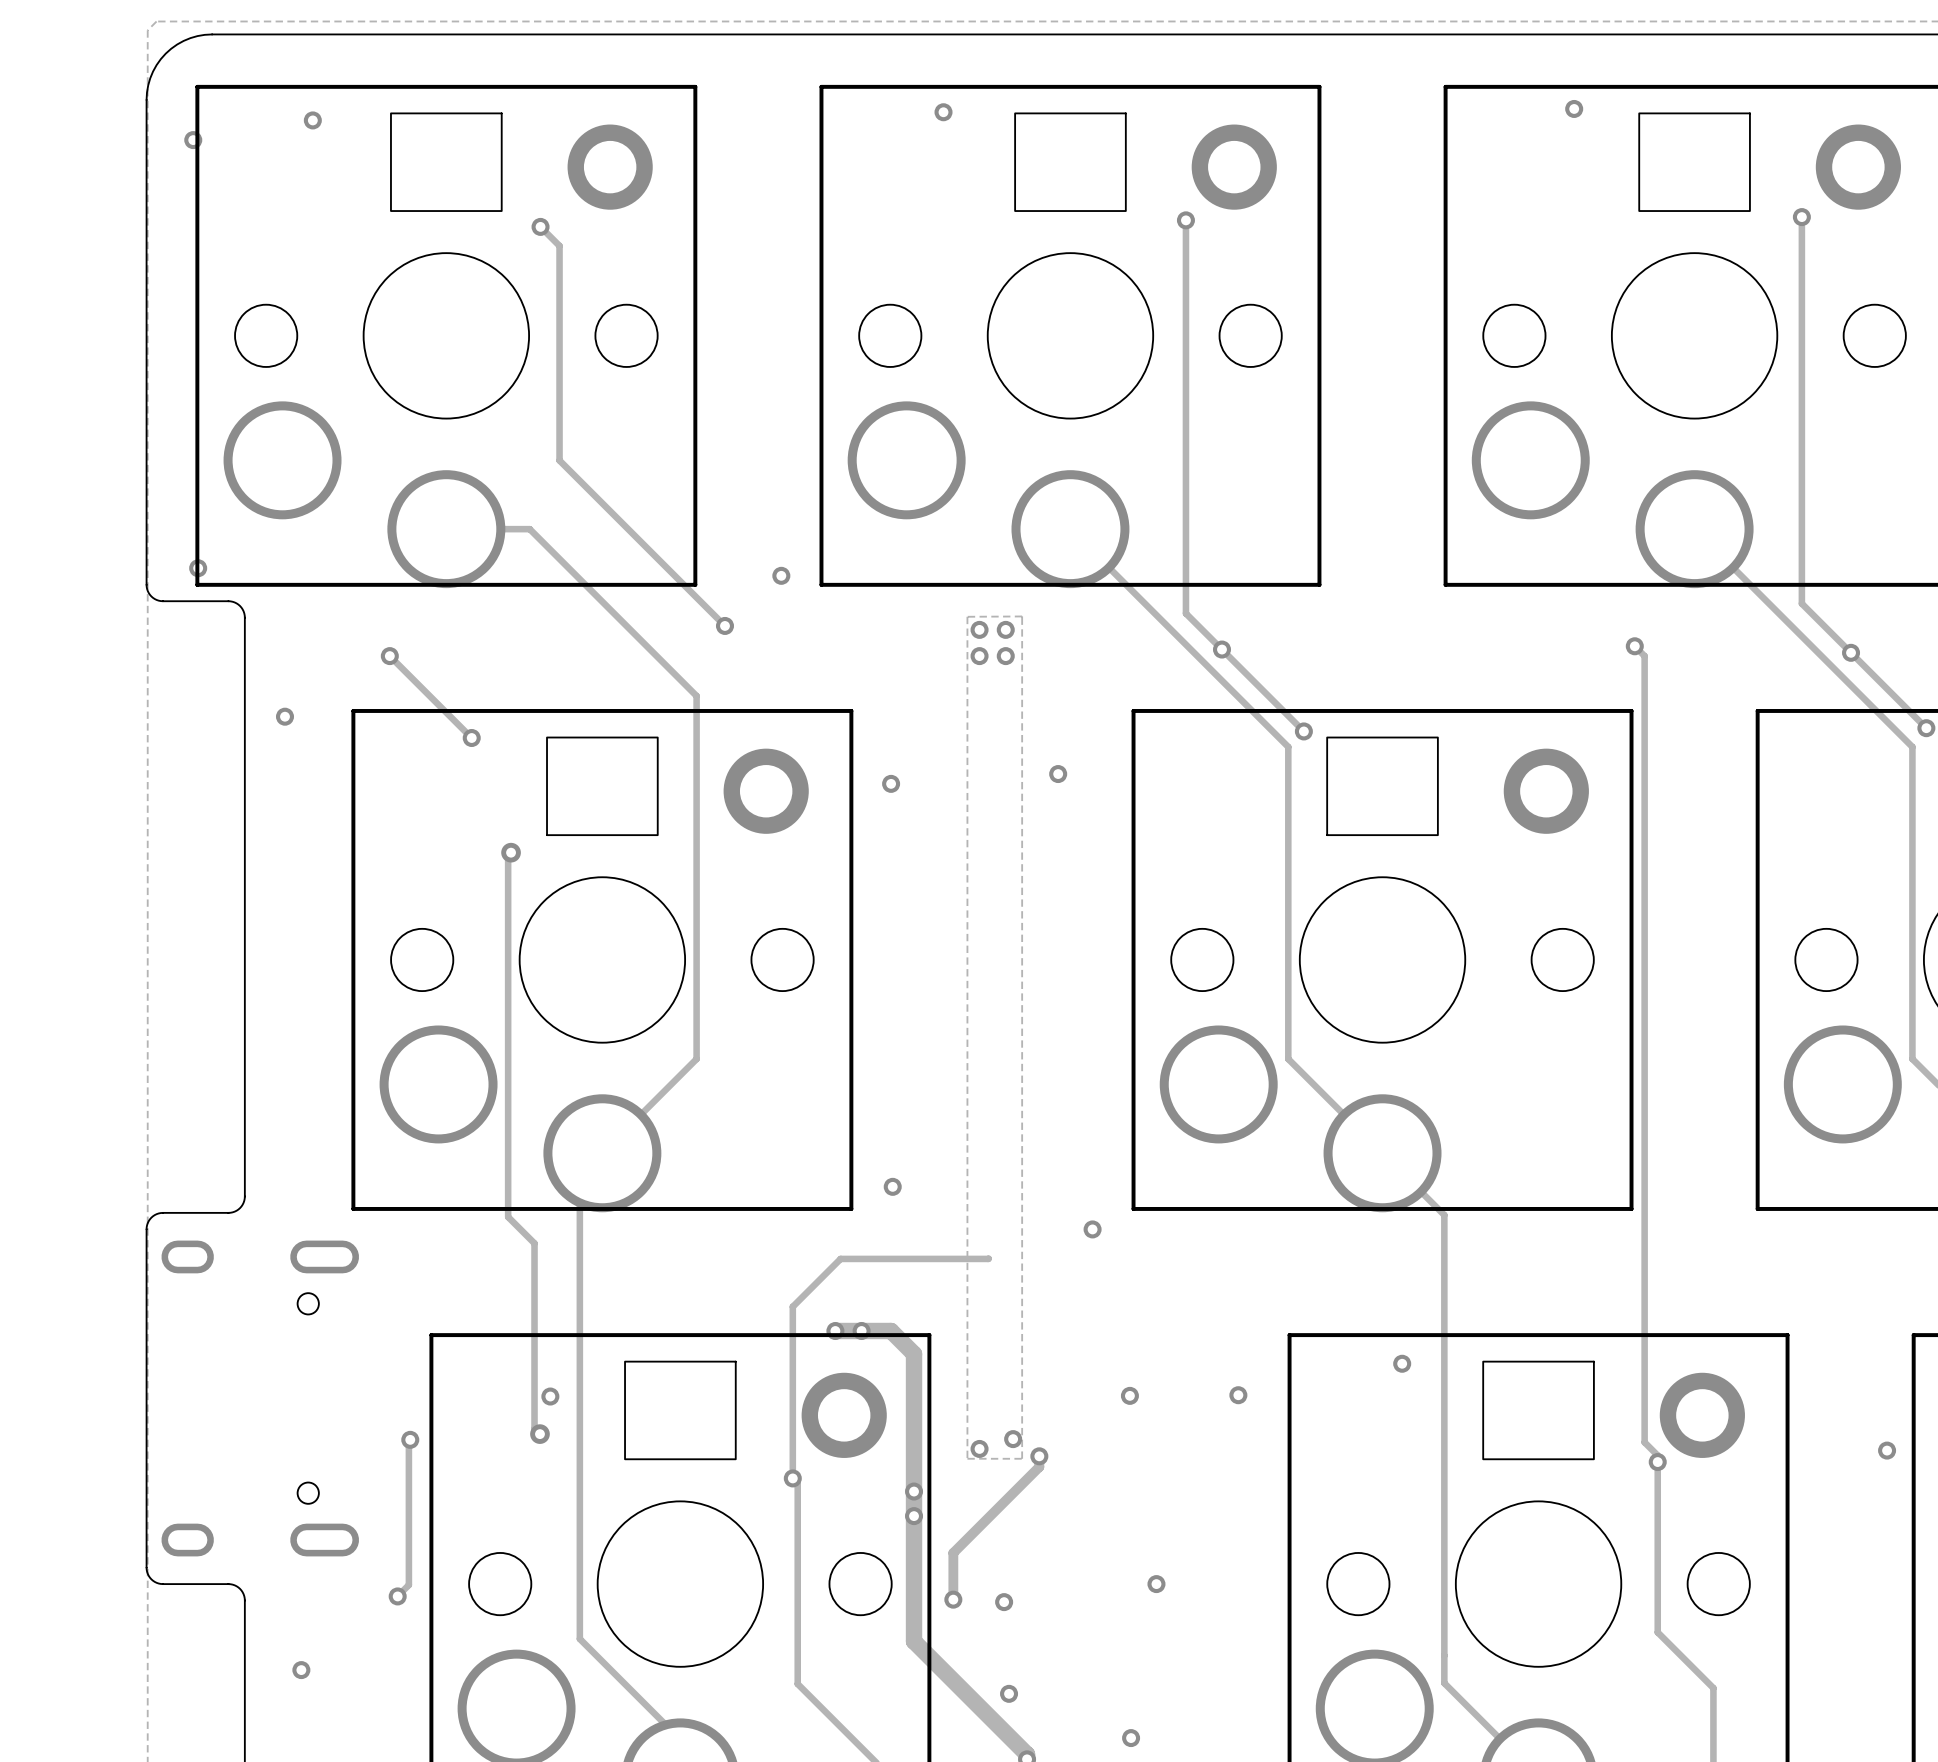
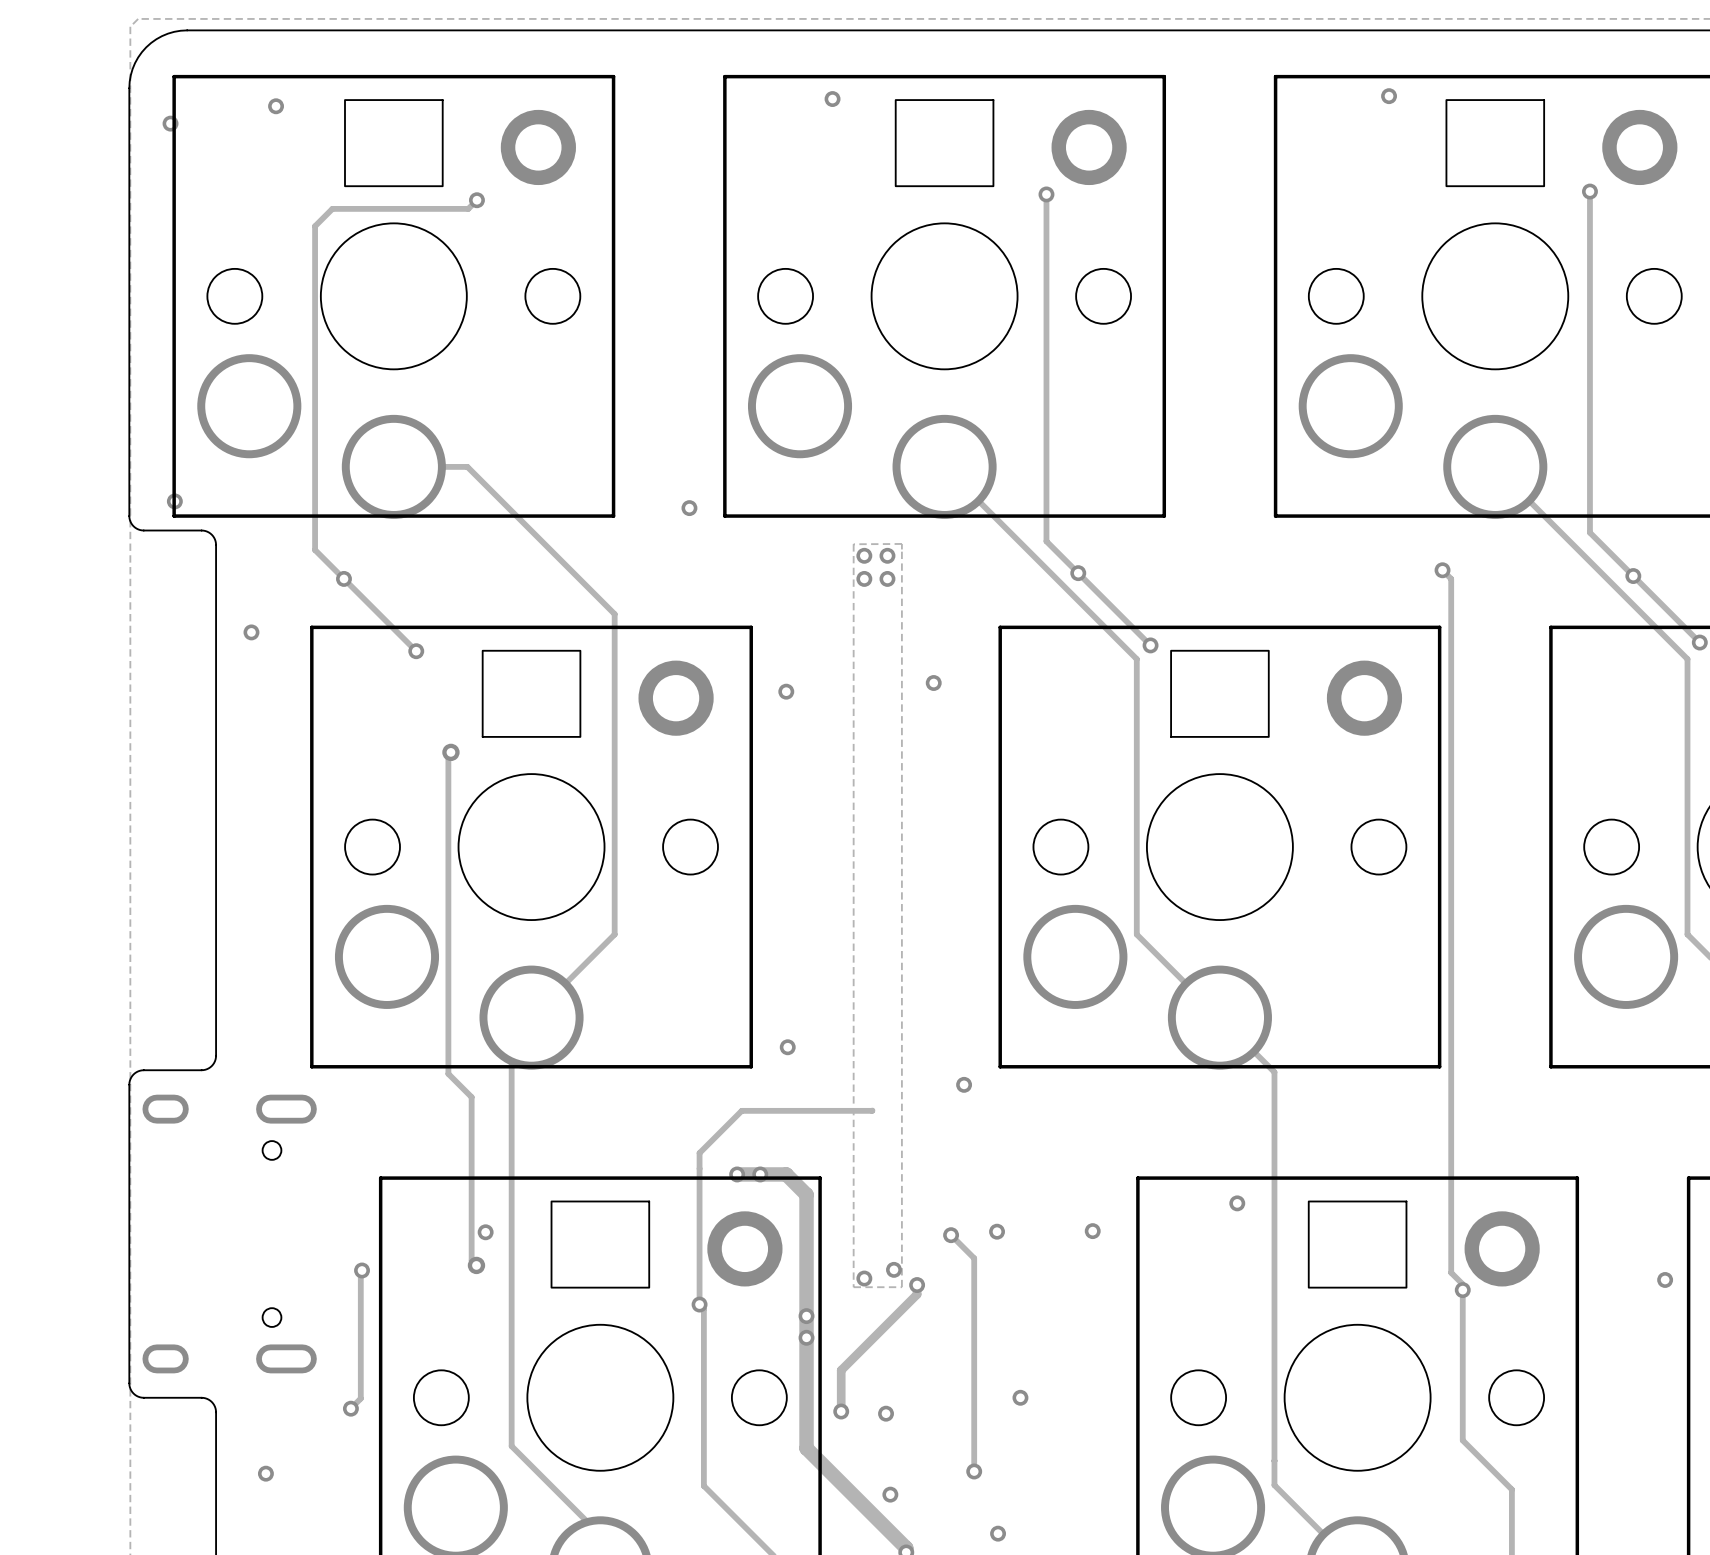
track: (540, 226) (559, 245) (559, 460) (724, 625) -> (476, 200) (468, 208) (332, 208) (315, 226) (315, 550) (343, 578)
via: (724, 625) -> none
track: none -> (951, 1235) (974, 1258) (974, 1471)
via: none -> (951, 1235)
via: none -> (974, 1471)

